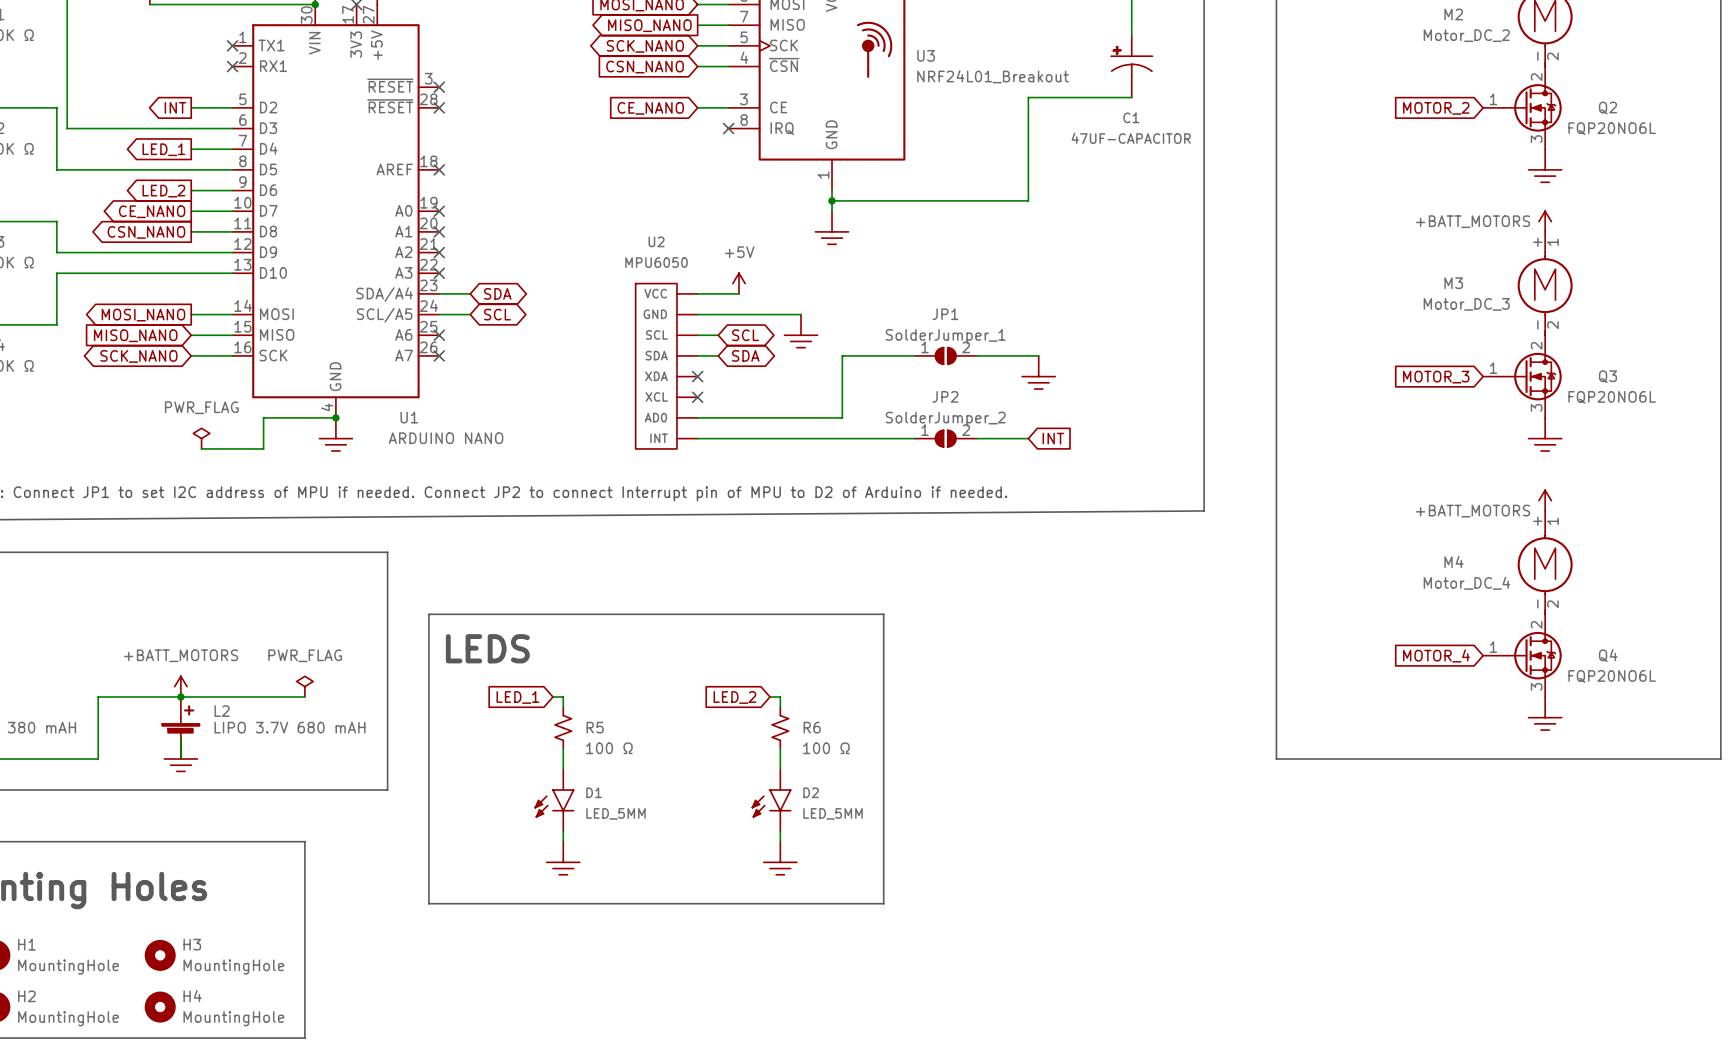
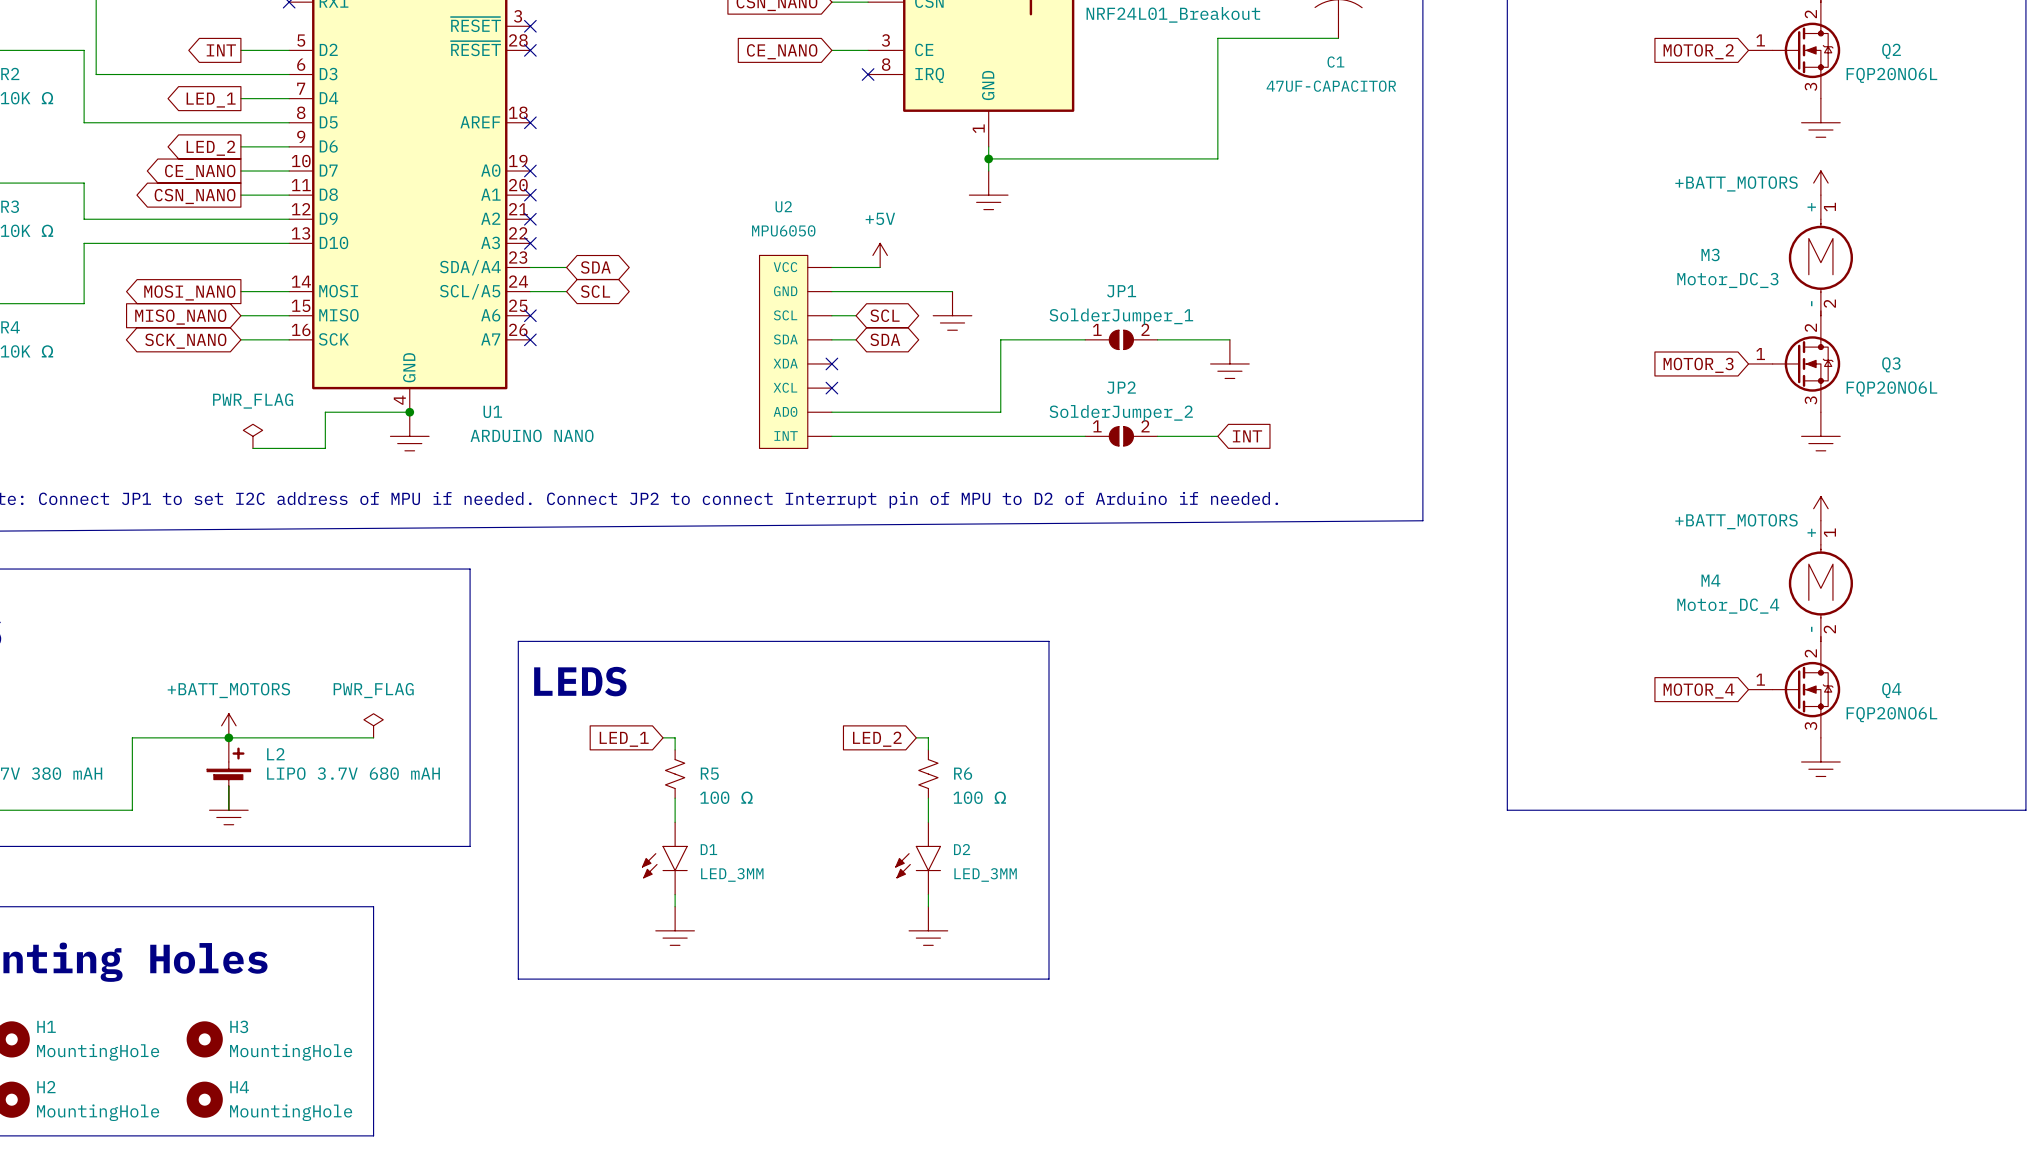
D1 value: LED_5MM (616, 813) -> LED_3MM (732, 874)
D2 value: LED_5MM (833, 813) -> LED_3MM (985, 874)

